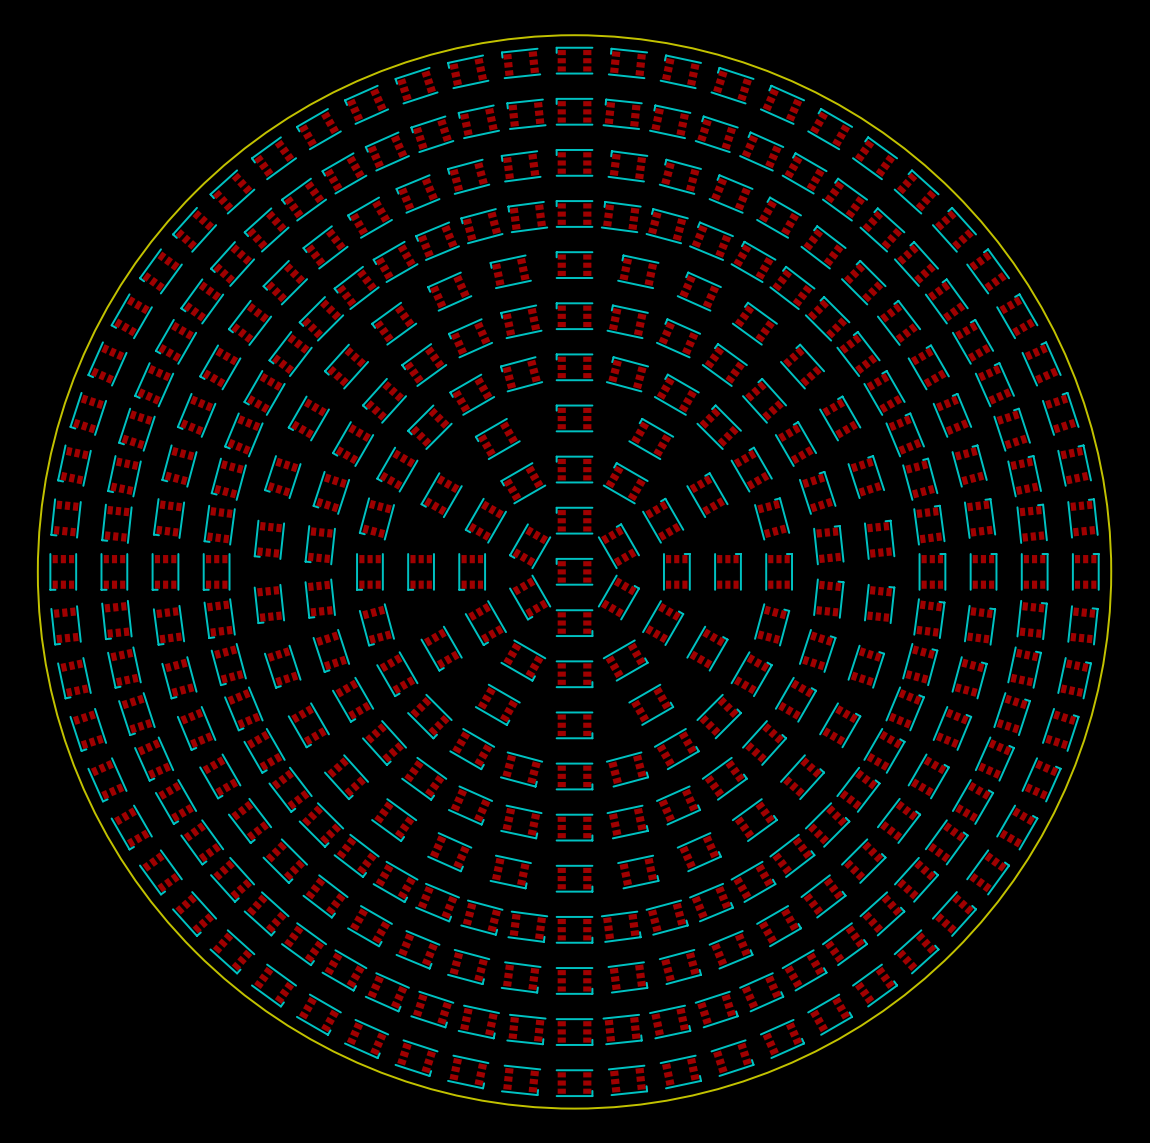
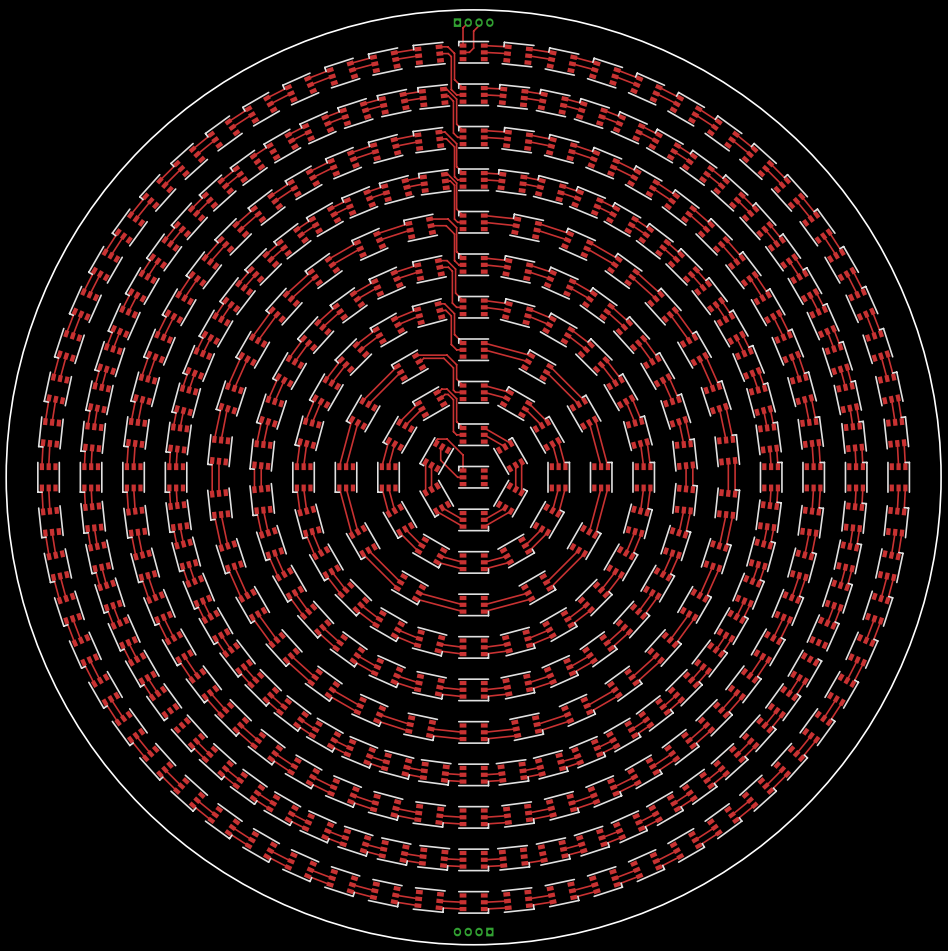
track: none -> (468, 22) (463, 27) (463, 45)
part: none -> (473, 22)
track: none -> (479, 22) (479, 25) (473, 31) (473, 48) (469, 52) (463, 52)
round board edge size: [37, 34, 1112, 1109] -> [5, 9, 942, 946]
track: none -> (484, 45) (508, 46)
track: none -> (439, 46) (447, 46) (454, 53) (454, 79) (463, 88)
track: none -> (417, 49) (394, 52)
track: none -> (529, 49) (553, 52)
track: none -> (484, 52) (507, 53)
track: none -> (439, 53) (448, 53) (451, 56) (451, 89) (456, 94) (463, 94)
track: none -> (418, 55) (395, 59)
track: none -> (528, 55) (551, 59)
track: none -> (373, 57) (350, 63)
track: none -> (573, 57) (596, 63)
track: none -> (374, 63) (352, 69)
track: none -> (572, 63) (594, 69)
track: none -> (330, 69) (307, 78)
track: none -> (617, 69) (639, 78)
track: none -> (332, 76) (310, 84)
track: none -> (615, 76) (636, 84)
track: none -> (288, 87) (266, 98)
track: none -> (658, 87) (680, 98)
track: none -> (484, 88) (503, 89)
track: none -> (443, 89) (446, 89) (456, 99) (456, 124) (463, 130)
track: none -> (422, 91) (403, 94)
track: none -> (524, 91) (544, 94)
track: none -> (291, 93) (270, 103)
track: none -> (656, 93) (676, 103)
track: none -> (484, 94) (503, 95)
track: none -> (444, 95) (448, 95) (453, 101) (453, 133) (457, 137) (463, 137)
track: none -> (423, 98) (404, 101)
track: none -> (524, 98) (542, 101)
track: none -> (382, 98) (363, 103)
track: none -> (564, 98) (583, 103)
track: none -> (383, 105) (365, 110)
track: none -> (563, 105) (581, 110)
track: none -> (248, 108) (228, 121)
track: none -> (698, 108) (718, 121)
track: none -> (343, 110) (325, 117)
track: none -> (604, 110) (622, 117)
track: none -> (251, 114) (232, 127)
track: none -> (695, 114) (714, 127)
track: none -> (345, 116) (327, 123)
track: none -> (601, 116) (619, 123)
track: none -> (305, 126) (288, 134)
track: none -> (641, 126) (659, 134)
track: none -> (484, 130) (508, 132)
track: none -> (308, 132) (291, 140)
track: none -> (438, 132) (445, 132) (456, 143) (456, 166) (463, 173)
track: none -> (638, 132) (655, 140)
track: none -> (211, 134) (192, 149)
track: none -> (736, 134) (754, 149)
track: none -> (417, 134) (394, 139)
track: none -> (529, 134) (553, 139)
track: none -> (484, 137) (507, 138)
track: none -> (439, 138) (446, 138) (454, 146) (454, 176) (457, 179) (463, 179)
track: none -> (215, 139) (197, 154)
track: none -> (732, 139) (750, 154)
track: none -> (418, 141) (395, 146)
track: none -> (528, 141) (551, 146)
track: none -> (269, 145) (253, 156)
track: none -> (373, 145) (350, 152)
track: none -> (573, 145) (596, 152)
track: none -> (677, 145) (693, 156)
track: none -> (674, 151) (689, 161)
track: none -> (375, 151) (353, 159)
track: none -> (571, 151) (593, 159)
track: none -> (331, 161) (309, 171)
track: none -> (616, 161) (637, 171)
track: none -> (176, 163) (159, 180)
track: none -> (770, 163) (787, 180)
track: none -> (333, 167) (312, 177)
track: none -> (613, 167) (634, 177)
track: none -> (181, 168) (164, 185)
track: none -> (236, 168) (221, 180)
track: none -> (711, 168) (726, 180)
track: none -> (765, 168) (782, 185)
track: none -> (484, 173) (502, 174)
track: none -> (240, 174) (225, 185)
track: none -> (444, 174) (447, 174) (456, 183) (456, 209) (463, 215)
track: none -> (707, 174) (721, 185)
track: none -> (423, 177) (405, 180)
track: none -> (523, 177) (542, 180)
track: none -> (484, 179) (501, 181)
track: none -> (445, 181) (450, 181) (454, 185) (454, 219) (457, 222) (463, 222)
track: none -> (291, 182) (270, 195)
track: none -> (656, 182) (676, 195)
track: none -> (424, 183) (406, 187)
track: none -> (523, 183) (540, 187)
track: none -> (384, 186) (367, 192)
track: none -> (562, 186) (580, 192)
track: none -> (294, 188) (275, 201)
track: none -> (652, 188) (672, 201)
track: none -> (386, 192) (369, 198)
track: none -> (560, 192) (577, 198)
track: none -> (205, 195) (191, 208)
track: none -> (741, 195) (755, 208)
track: none -> (145, 196) (130, 214)
track: none -> (801, 196) (816, 214)
track: none -> (209, 200) (196, 213)
track: none -> (347, 200) (330, 208)
track: none -> (599, 200) (616, 208)
track: none -> (737, 200) (750, 213)
track: none -> (150, 200) (136, 218)
track: none -> (796, 200) (811, 218)
track: none -> (349, 206) (334, 214)
track: none -> (597, 206) (613, 214)
track: none -> (254, 208) (235, 224)
track: none -> (693, 208) (711, 224)
track: none -> (258, 214) (240, 229)
track: none -> (689, 214) (706, 229)
track: none -> (484, 215) (517, 219)
track: none -> (312, 219) (296, 229)
track: none -> (429, 219) (448, 219) (456, 227) (456, 251) (463, 258)
track: none -> (634, 219) (650, 229)
track: none -> (484, 222) (516, 225)
track: none -> (408, 223) (376, 233)
track: none -> (538, 223) (570, 233)
track: none -> (177, 224) (164, 239)
track: none -> (315, 225) (300, 234)
track: none -> (631, 225) (646, 234)
track: none -> (770, 224) (782, 239)
track: none -> (431, 225) (446, 225) (454, 234) (454, 260) (458, 264) (463, 264)
track: none -> (182, 229) (170, 243)
track: none -> (764, 229) (776, 243)
track: none -> (410, 230) (379, 240)
track: none -> (537, 230) (567, 240)
track: none -> (118, 232) (105, 252)
track: none -> (829, 232) (842, 252)
track: none -> (123, 236) (110, 255)
track: none -> (823, 236) (836, 255)
track: none -> (220, 239) (205, 257)
track: none -> (726, 239) (742, 257)
track: none -> (279, 242) (266, 254)
track: none -> (357, 242) (328, 259)
track: none -> (589, 242) (618, 259)
track: none -> (667, 242) (681, 254)
track: none -> (225, 244) (210, 261)
track: none -> (721, 244) (736, 261)
track: none -> (284, 247) (270, 259)
track: none -> (663, 247) (676, 259)
track: none -> (360, 248) (332, 264)
track: none -> (587, 248) (614, 264)
track: none -> (152, 257) (141, 273)
track: none -> (794, 257) (805, 273)
track: none -> (484, 258) (508, 260)
track: none -> (157, 261) (147, 276)
track: none -> (438, 260) (447, 260) (455, 269) (455, 293) (463, 300)
track: none -> (789, 261) (799, 276)
track: none -> (417, 265) (394, 272)
track: none -> (484, 264) (507, 267)
track: none -> (529, 265) (553, 272)
track: none -> (439, 267) (448, 267) (452, 271) (452, 303) (456, 307) (463, 307)
track: none -> (250, 269) (238, 283)
track: none -> (696, 269) (708, 283)
track: none -> (94, 270) (83, 292)
track: none -> (852, 270) (863, 292)
track: none -> (311, 271) (286, 294)
track: none -> (419, 271) (396, 278)
track: none -> (528, 271) (550, 278)
track: none -> (636, 271) (661, 294)
track: none -> (100, 274) (89, 294)
track: none -> (255, 274) (244, 287)
track: none -> (691, 274) (703, 287)
track: none -> (846, 274) (857, 294)
track: none -> (192, 274) (178, 294)
track: none -> (755, 274) (768, 294)
track: none -> (315, 277) (291, 298)
track: none -> (632, 277) (656, 298)
track: none -> (197, 278) (184, 298)
track: none -> (749, 278) (762, 298)
track: none -> (374, 281) (353, 293)
track: none -> (572, 281) (593, 293)
track: none -> (377, 287) (357, 299)
track: none -> (569, 287) (589, 299)
track: none -> (131, 291) (122, 309)
track: none -> (816, 291) (824, 309)
track: none -> (137, 295) (128, 312)
track: none -> (810, 295) (818, 312)
track: none -> (225, 300) (215, 315)
track: none -> (484, 300) (509, 303)
track: none -> (721, 300) (731, 315)
track: none -> (438, 303) (444, 303) (454, 313) (454, 334) (463, 343)
track: none -> (231, 304) (221, 319)
track: none -> (716, 304) (725, 319)
track: none -> (336, 306) (317, 322)
track: none -> (611, 306) (629, 322)
track: none -> (484, 307) (507, 310)
track: none -> (417, 309) (394, 318)
track: none -> (529, 309) (552, 318)
track: none -> (271, 310) (252, 337)
track: none -> (675, 310) (695, 337)
track: none -> (439, 310) (445, 310) (451, 315) (451, 344) (456, 349) (463, 349)
track: none -> (74, 311) (66, 333)
track: none -> (340, 311) (322, 327)
track: none -> (607, 311) (624, 327)
track: none -> (872, 311) (880, 333)
track: none -> (168, 313) (157, 334)
track: none -> (779, 313) (789, 334)
track: none -> (81, 314) (72, 335)
track: none -> (866, 314) (874, 335)
track: none -> (277, 314) (258, 340)
track: none -> (670, 314) (689, 340)
track: none -> (419, 315) (397, 324)
track: none -> (527, 315) (549, 324)
track: none -> (173, 316) (163, 337)
track: none -> (773, 316) (783, 337)
track: none -> (113, 328) (106, 346)
track: none -> (833, 328) (840, 346)
track: none -> (376, 329) (356, 344)
track: none -> (571, 329) (591, 344)
track: none -> (119, 331) (113, 349)
track: none -> (827, 331) (834, 349)
track: none -> (204, 334) (196, 351)
track: none -> (742, 334) (750, 351)
track: none -> (379, 335) (360, 349)
track: none -> (567, 335) (586, 349)
track: none -> (210, 337) (202, 353)
track: none -> (303, 338) (289, 358)
track: none -> (643, 338) (658, 358)
track: none -> (736, 337) (744, 353)
track: none -> (308, 343) (294, 361)
track: none -> (484, 343) (531, 355)
track: none -> (638, 343) (652, 361)
track: none -> (484, 349) (528, 361)
track: none -> (59, 354) (53, 377)
track: none -> (887, 354) (893, 377)
track: none -> (149, 354) (141, 377)
track: none -> (798, 354) (805, 377)
track: none -> (241, 355) (227, 386)
track: none -> (415, 355) (447, 355) (456, 364) (456, 379) (463, 385)
track: none -> (705, 355) (719, 386)
track: none -> (66, 356) (60, 378)
track: none -> (881, 356) (887, 378)
track: none -> (155, 357) (148, 379)
track: none -> (791, 357) (799, 379)
track: none -> (247, 359) (234, 388)
track: none -> (699, 359) (712, 388)
track: none -> (341, 359) (325, 379)
track: none -> (606, 359) (621, 379)
track: none -> (419, 361) (423, 358) (443, 358) (453, 367) (453, 390) (455, 392) (463, 392)
track: none -> (345, 364) (331, 383)
track: none -> (601, 364) (615, 383)
track: none -> (397, 366) (362, 400)
track: none -> (549, 366) (584, 400)
track: none -> (100, 367) (95, 385)
track: none -> (847, 367) (852, 385)
track: none -> (106, 369) (101, 387)
track: none -> (840, 369) (845, 387)
track: none -> (188, 370) (182, 388)
track: none -> (758, 370) (764, 388)
track: none -> (400, 372) (368, 404)
track: none -> (546, 372) (578, 404)
track: none -> (194, 373) (189, 390)
track: none -> (752, 373) (758, 390)
track: none -> (278, 376) (268, 399)
track: none -> (668, 376) (678, 399)
track: none -> (284, 380) (274, 401)
track: none -> (662, 380) (672, 401)
track: none -> (484, 385) (510, 392)
track: none -> (436, 392) (441, 389) (447, 389) (456, 398) (456, 421) (463, 428)
track: none -> (484, 392) (506, 398)
track: none -> (49, 397) (45, 421)
track: none -> (135, 397) (131, 421)
track: none -> (315, 398) (305, 421)
track: none -> (440, 398) (448, 394) (453, 399) (453, 431) (456, 434) (463, 434)
track: none -> (632, 398) (641, 421)
track: none -> (811, 397) (816, 421)
track: none -> (898, 397) (901, 421)
track: none -> (55, 399) (52, 422)
track: none -> (142, 399) (137, 422)
track: none -> (804, 399) (809, 422)
track: none -> (891, 399) (895, 422)
track: none -> (321, 401) (312, 423)
track: none -> (626, 401) (635, 423)
track: none -> (418, 403) (399, 422)
track: none -> (528, 403) (547, 422)
track: none -> (221, 406) (214, 439)
track: none -> (725, 406) (732, 439)
track: none -> (90, 406) (87, 426)
track: none -> (856, 406) (859, 426)
track: none -> (97, 408) (94, 426)
track: none -> (849, 408) (852, 426)
track: none -> (176, 408) (173, 427)
track: none -> (227, 408) (221, 440)
track: none -> (421, 409) (405, 425)
track: none -> (525, 409) (541, 425)
track: none -> (719, 408) (726, 440)
track: none -> (770, 408) (773, 427)
track: none -> (183, 410) (180, 427)
track: none -> (763, 410) (767, 427)
track: none -> (261, 419) (256, 443)
track: none -> (352, 419) (339, 466)
track: none -> (595, 419) (607, 466)
track: none -> (685, 419) (690, 443)
track: none -> (268, 421) (263, 444)
track: none -> (678, 421) (683, 444)
track: none -> (357, 422) (346, 466)
track: none -> (589, 422) (601, 466)
track: none -> (484, 428) (511, 443)
track: none -> (484, 434) (505, 446)
track: none -> (388, 440) (381, 466)
track: none -> (558, 440) (565, 466)
track: none -> (300, 441) (296, 466)
track: none -> (647, 441) (650, 466)
track: none -> (43, 442) (41, 466)
track: none -> (128, 442) (126, 466)
track: none -> (818, 442) (820, 466)
track: none -> (904, 442) (905, 466)
track: none -> (49, 443) (48, 466)
track: none -> (135, 443) (133, 466)
track: none -> (306, 443) (303, 466)
track: none -> (394, 444) (388, 466)
track: none -> (436, 443) (437, 439) (447, 439) (463, 455) (463, 470)
track: none -> (552, 444) (558, 466)
track: none -> (640, 443) (643, 466)
track: none -> (812, 443) (813, 466)
track: none -> (897, 443) (898, 466)
track: none -> (85, 447) (84, 466)
track: none -> (442, 446) (440, 460) (457, 477) (463, 477)
track: none -> (861, 447) (862, 466)
track: none -> (92, 447) (91, 466)
track: none -> (170, 448) (169, 466)
track: none -> (776, 448) (777, 466)
track: none -> (855, 447) (856, 466)
track: none -> (177, 449) (176, 466)
track: none -> (769, 449) (771, 466)
track: none -> (212, 460) (212, 494)
track: none -> (735, 460) (735, 494)
track: none -> (218, 461) (218, 493)
track: none -> (728, 461) (728, 493)
track: none -> (425, 461) (425, 492)
track: none -> (521, 461) (521, 492)
track: none -> (254, 464) (254, 489)
track: none -> (261, 465) (261, 488)
track: none -> (431, 465) (431, 489)
track: none -> (515, 465) (515, 489)
track: none -> (686, 465) (686, 488)
track: none -> (692, 464) (692, 489)
track: none -> (41, 487) (43, 511)
track: none -> (48, 487) (49, 511)
track: none -> (84, 487) (85, 507)
track: none -> (91, 487) (92, 506)
track: none -> (126, 487) (128, 512)
track: none -> (133, 487) (135, 511)
track: none -> (169, 487) (170, 506)
track: none -> (176, 487) (177, 505)
track: none -> (296, 487) (300, 512)
track: none -> (303, 487) (306, 511)
track: none -> (339, 487) (352, 535)
track: none -> (346, 487) (357, 531)
track: none -> (381, 487) (388, 514)
track: none -> (388, 487) (394, 510)
track: none -> (558, 487) (552, 510)
track: none -> (565, 487) (558, 514)
track: none -> (601, 487) (589, 531)
track: none -> (607, 487) (595, 535)
track: none -> (643, 487) (640, 511)
track: none -> (650, 487) (647, 512)
track: none -> (771, 487) (769, 505)
track: none -> (777, 487) (776, 506)
track: none -> (813, 487) (812, 511)
track: none -> (820, 487) (818, 512)
track: none -> (856, 487) (855, 506)
track: none -> (862, 487) (861, 507)
track: none -> (898, 487) (897, 511)
track: none -> (905, 487) (904, 511)
track: none -> (442, 507) (463, 519)
track: none -> (505, 507) (484, 519)
track: none -> (263, 510) (268, 532)
track: none -> (683, 510) (678, 532)
track: none -> (256, 510) (261, 534)
track: none -> (436, 511) (463, 526)
track: none -> (511, 511) (484, 526)
track: none -> (690, 510) (685, 534)
track: none -> (221, 514) (227, 546)
track: none -> (726, 514) (719, 546)
track: none -> (214, 515) (221, 548)
track: none -> (732, 515) (725, 548)
track: none -> (180, 526) (183, 544)
track: none -> (767, 526) (763, 544)
track: none -> (94, 527) (97, 546)
track: none -> (173, 527) (176, 545)
track: none -> (773, 527) (770, 545)
track: none -> (852, 527) (849, 546)
track: none -> (87, 528) (90, 547)
track: none -> (859, 528) (856, 547)
track: none -> (405, 529) (421, 545)
track: none -> (541, 529) (525, 545)
track: none -> (137, 532) (142, 555)
track: none -> (312, 531) (321, 553)
track: none -> (635, 531) (626, 553)
track: none -> (809, 532) (804, 555)
track: none -> (45, 533) (49, 556)
track: none -> (52, 532) (55, 555)
track: none -> (399, 532) (418, 551)
track: none -> (547, 532) (528, 551)
track: none -> (895, 532) (891, 555)
track: none -> (901, 533) (898, 556)
track: none -> (131, 533) (135, 556)
track: none -> (305, 533) (315, 556)
track: none -> (641, 533) (632, 556)
track: none -> (816, 533) (811, 556)
track: none -> (368, 550) (400, 582)
track: none -> (578, 550) (546, 582)
track: none -> (274, 553) (284, 574)
track: none -> (362, 553) (397, 588)
track: none -> (584, 553) (549, 588)
track: none -> (672, 553) (662, 574)
track: none -> (268, 555) (278, 577)
track: none -> (678, 555) (668, 577)
track: none -> (440, 556) (463, 562)
track: none -> (506, 556) (484, 562)
track: none -> (436, 562) (463, 569)
track: none -> (510, 562) (484, 569)
track: none -> (189, 564) (194, 581)
track: none -> (758, 564) (752, 581)
track: none -> (182, 566) (188, 583)
track: none -> (234, 566) (247, 595)
track: none -> (712, 566) (699, 595)
track: none -> (764, 566) (758, 583)
track: none -> (101, 567) (106, 585)
track: none -> (845, 567) (840, 585)
track: none -> (95, 568) (100, 587)
track: none -> (227, 568) (241, 599)
track: none -> (719, 568) (705, 599)
track: none -> (852, 568) (847, 587)
track: none -> (331, 571) (345, 590)
track: none -> (615, 571) (601, 590)
track: none -> (325, 574) (341, 594)
track: none -> (621, 574) (606, 594)
track: none -> (60, 576) (66, 598)
track: none -> (148, 575) (155, 597)
track: none -> (799, 575) (791, 597)
track: none -> (887, 576) (881, 598)
track: none -> (53, 577) (59, 600)
track: none -> (141, 577) (149, 600)
track: none -> (805, 577) (798, 600)
track: none -> (893, 577) (887, 600)
track: none -> (294, 592) (308, 611)
track: none -> (652, 592) (638, 611)
track: none -> (419, 593) (463, 604)
track: none -> (528, 593) (484, 604)
track: none -> (289, 596) (303, 616)
track: none -> (658, 596) (643, 616)
track: none -> (415, 598) (463, 611)
track: none -> (531, 598) (484, 611)
track: none -> (202, 600) (210, 616)
track: none -> (744, 600) (736, 616)
track: none -> (196, 603) (204, 620)
track: none -> (750, 603) (742, 620)
track: none -> (360, 605) (379, 619)
track: none -> (586, 605) (567, 619)
track: none -> (113, 605) (119, 623)
track: none -> (834, 605) (827, 623)
track: none -> (106, 607) (113, 625)
track: none -> (840, 607) (833, 625)
track: none -> (356, 609) (376, 625)
track: none -> (591, 609) (571, 625)
track: none -> (258, 614) (277, 640)
track: none -> (689, 614) (670, 640)
track: none -> (163, 617) (173, 638)
track: none -> (252, 617) (271, 644)
track: none -> (695, 617) (675, 644)
track: none -> (783, 617) (773, 638)
track: none -> (72, 618) (81, 640)
track: none -> (874, 618) (866, 640)
track: none -> (157, 619) (168, 641)
track: none -> (789, 619) (779, 641)
track: none -> (66, 620) (74, 643)
track: none -> (880, 620) (872, 643)
track: none -> (322, 627) (340, 642)
track: none -> (624, 627) (607, 642)
track: none -> (397, 629) (419, 638)
track: none -> (549, 629) (527, 638)
track: none -> (317, 631) (336, 648)
track: none -> (629, 631) (611, 648)
track: none -> (221, 635) (231, 649)
track: none -> (725, 635) (716, 649)
track: none -> (394, 635) (417, 645)
track: none -> (552, 635) (529, 645)
track: none -> (215, 638) (225, 654)
track: none -> (731, 638) (721, 654)
track: none -> (128, 642) (137, 659)
track: none -> (439, 644) (463, 647)
track: none -> (507, 644) (484, 647)
track: none -> (122, 645) (131, 662)
track: none -> (438, 650) (463, 654)
track: none -> (509, 650) (484, 654)
track: none -> (291, 655) (315, 677)
track: none -> (357, 655) (377, 667)
track: none -> (589, 655) (569, 667)
track: none -> (656, 655) (632, 677)
track: none -> (184, 656) (197, 675)
track: none -> (762, 656) (749, 675)
track: none -> (89, 659) (100, 680)
track: none -> (178, 659) (192, 679)
track: none -> (768, 659) (755, 679)
track: none -> (857, 659) (846, 680)
track: none -> (286, 660) (311, 682)
track: none -> (353, 660) (374, 673)
track: none -> (593, 660) (572, 673)
track: none -> (661, 660) (636, 682)
track: none -> (83, 662) (94, 683)
track: none -> (863, 662) (852, 683)
track: none -> (244, 666) (255, 680)
track: none -> (703, 666) (691, 680)
track: none -> (238, 670) (250, 684)
track: none -> (708, 670) (696, 684)
track: none -> (396, 675) (419, 682)
track: none -> (550, 675) (528, 682)
track: none -> (147, 677) (157, 693)
track: none -> (799, 677) (789, 693)
track: none -> (141, 681) (152, 697)
track: none -> (805, 681) (794, 697)
track: none -> (394, 681) (417, 689)
track: none -> (553, 681) (529, 689)
track: none -> (439, 687) (463, 689)
track: none -> (507, 687) (484, 689)
track: none -> (332, 689) (360, 705)
track: none -> (614, 689) (587, 705)
track: none -> (210, 692) (225, 710)
track: none -> (736, 692) (721, 710)
track: none -> (438, 694) (463, 696)
track: none -> (508, 694) (484, 696)
track: none -> (270, 695) (284, 706)
track: none -> (676, 695) (663, 706)
track: none -> (328, 695) (357, 712)
track: none -> (618, 695) (589, 712)
track: none -> (205, 696) (220, 715)
track: none -> (742, 696) (726, 715)
track: none -> (110, 698) (123, 718)
track: none -> (836, 698) (823, 718)
track: none -> (266, 699) (279, 712)
track: none -> (681, 699) (667, 712)
track: none -> (105, 702) (118, 722)
track: none -> (842, 702) (829, 722)
track: none -> (776, 710) (764, 725)
track: none -> (379, 714) (410, 724)
track: none -> (567, 714) (537, 724)
track: none -> (782, 714) (770, 729)
track: none -> (300, 719) (315, 729)
track: none -> (646, 719) (631, 729)
track: none -> (376, 720) (408, 731)
track: none -> (570, 720) (538, 731)
track: none -> (240, 725) (258, 740)
track: none -> (296, 725) (312, 735)
track: none -> (650, 725) (634, 735)
track: none -> (706, 725) (689, 740)
track: none -> (431, 728) (463, 732)
track: none -> (516, 728) (484, 732)
track: none -> (235, 730) (254, 745)
track: none -> (711, 730) (693, 745)
track: none -> (136, 735) (150, 753)
track: none -> (429, 735) (463, 739)
track: none -> (517, 735) (484, 739)
track: none -> (811, 735) (796, 753)
track: none -> (130, 739) (145, 758)
track: none -> (816, 739) (801, 758)
track: none -> (334, 740) (349, 748)
track: none -> (613, 740) (597, 748)
track: none -> (196, 741) (209, 754)
track: none -> (750, 741) (737, 754)
track: none -> (191, 745) (205, 759)
track: none -> (755, 745) (741, 759)
track: none -> (330, 746) (347, 754)
track: none -> (616, 746) (599, 754)
track: none -> (275, 753) (294, 766)
track: none -> (672, 753) (652, 766)
track: none -> (369, 756) (386, 761)
track: none -> (577, 756) (560, 761)
track: none -> (270, 758) (291, 772)
track: none -> (676, 758) (656, 772)
track: none -> (367, 762) (384, 768)
track: none -> (580, 762) (562, 768)
track: none -> (406, 767) (424, 770)
track: none -> (540, 767) (523, 770)
track: none -> (225, 768) (240, 780)
track: none -> (721, 768) (707, 780)
track: none -> (164, 769) (181, 786)
track: none -> (782, 769) (765, 786)
track: none -> (159, 774) (176, 791)
track: none -> (221, 773) (236, 785)
track: none -> (405, 773) (423, 777)
track: none -> (445, 773) (463, 774)
track: none -> (501, 773) (484, 774)
track: none -> (542, 773) (523, 777)
track: none -> (726, 773) (711, 785)
track: none -> (787, 774) (770, 791)
track: none -> (312, 777) (333, 787)
track: none -> (634, 777) (613, 787)
track: none -> (444, 780) (463, 781)
track: none -> (502, 780) (484, 781)
track: none -> (309, 782) (331, 793)
track: none -> (637, 782) (616, 793)
track: none -> (257, 792) (273, 803)
track: none -> (689, 792) (674, 803)
track: none -> (353, 795) (375, 802)
track: none -> (593, 795) (571, 802)
track: none -> (253, 798) (269, 809)
track: none -> (693, 798) (677, 809)
track: none -> (197, 800) (215, 814)
track: none -> (750, 800) (732, 814)
track: none -> (350, 801) (373, 809)
track: none -> (596, 801) (573, 809)
track: none -> (192, 805) (211, 820)
track: none -> (754, 805) (736, 820)
track: none -> (395, 808) (418, 812)
track: none -> (551, 808) (528, 812)
track: none -> (291, 813) (308, 822)
track: none -> (655, 813) (638, 822)
track: none -> (394, 815) (417, 819)
track: none -> (439, 815) (463, 817)
track: none -> (507, 815) (484, 817)
track: none -> (553, 815) (529, 819)
track: none -> (288, 819) (305, 828)
track: none -> (659, 819) (641, 828)
track: none -> (438, 822) (463, 824)
track: none -> (508, 822) (484, 824)
track: none -> (232, 827) (251, 840)
track: none -> (714, 827) (695, 840)
track: none -> (327, 831) (345, 837)
track: none -> (619, 831) (601, 837)
track: none -> (228, 832) (248, 845)
track: none -> (718, 832) (698, 845)
track: none -> (325, 837) (343, 844)
track: none -> (622, 837) (604, 844)
track: none -> (365, 844) (383, 849)
track: none -> (581, 844) (563, 849)
track: none -> (270, 850) (291, 861)
track: none -> (676, 850) (656, 861)
track: none -> (363, 850) (382, 855)
track: none -> (583, 850) (564, 855)
track: none -> (404, 853) (423, 856)
track: none -> (266, 856) (265, 855) (288, 867)
track: none -> (680, 856) (658, 867)
track: none -> (444, 858) (463, 859)
track: none -> (503, 858) (484, 859)
track: none -> (403, 860) (422, 863)
track: none -> (544, 860) (524, 863)
track: none -> (443, 865) (463, 866)
track: none -> (503, 865) (484, 866)
track: none -> (310, 869) (332, 878)
track: none -> (636, 869) (615, 878)
track: none -> (307, 876) (330, 884)
track: none -> (639, 876) (617, 884)
track: none -> (352, 884) (374, 890)
track: none -> (594, 884) (572, 890)
track: none -> (350, 891) (373, 897)
track: none -> (596, 891) (573, 897)
track: none -> (395, 895) (418, 898)
track: none -> (551, 895) (528, 898)
track: none -> (439, 901) (463, 902)
track: none -> (507, 901) (484, 902)
track: none -> (394, 901) (417, 905)
track: none -> (553, 901) (529, 905)
track: none -> (439, 907) (463, 909)
track: none -> (508, 907) (484, 909)
part: none -> (473, 932)

